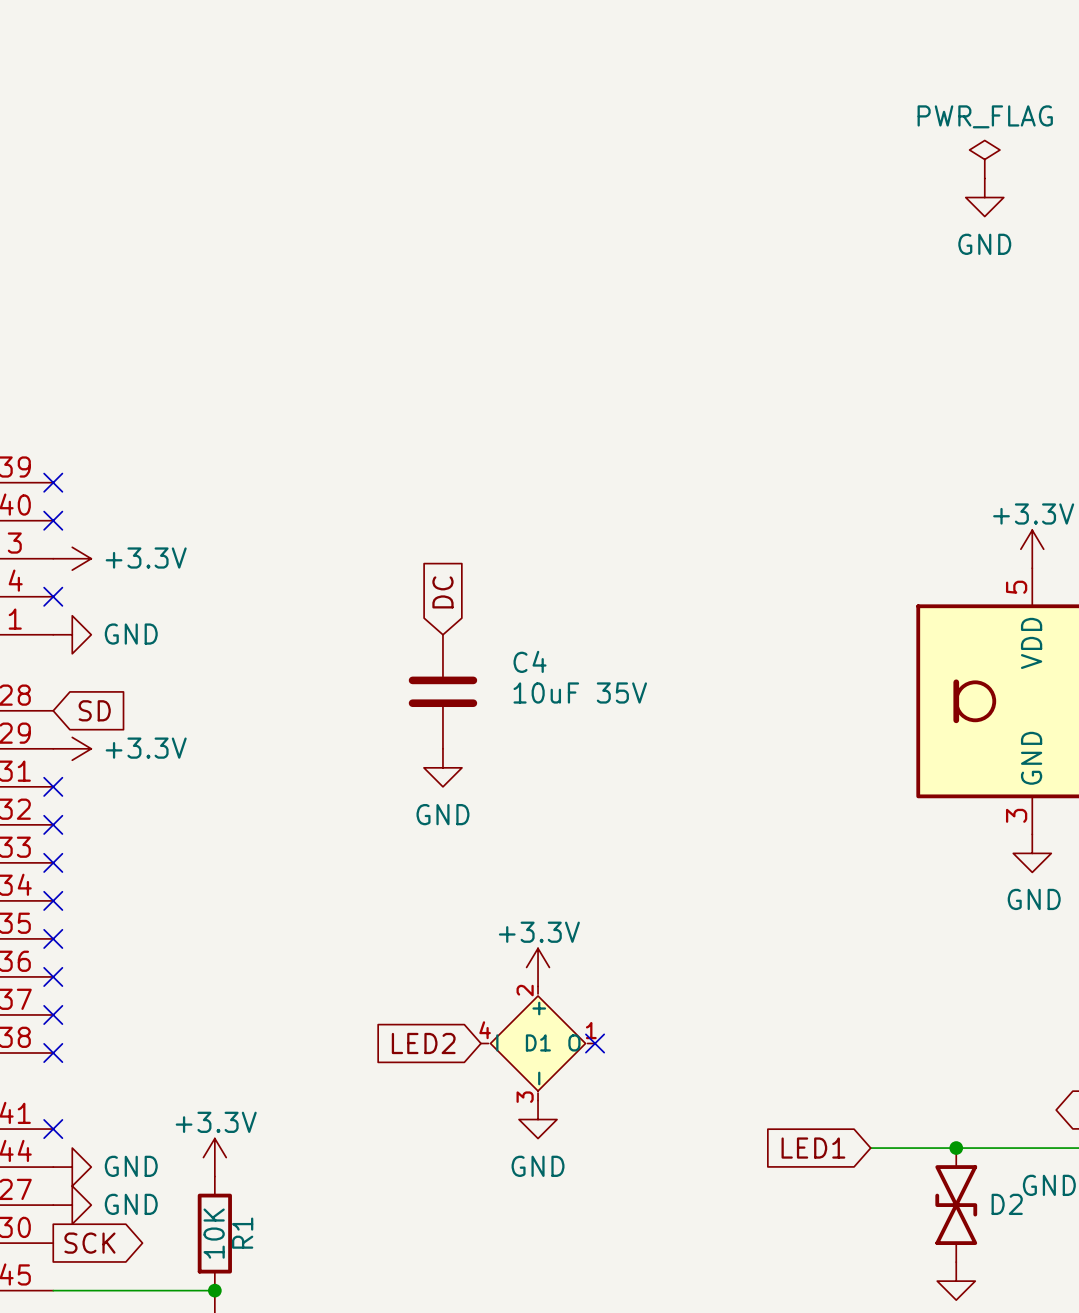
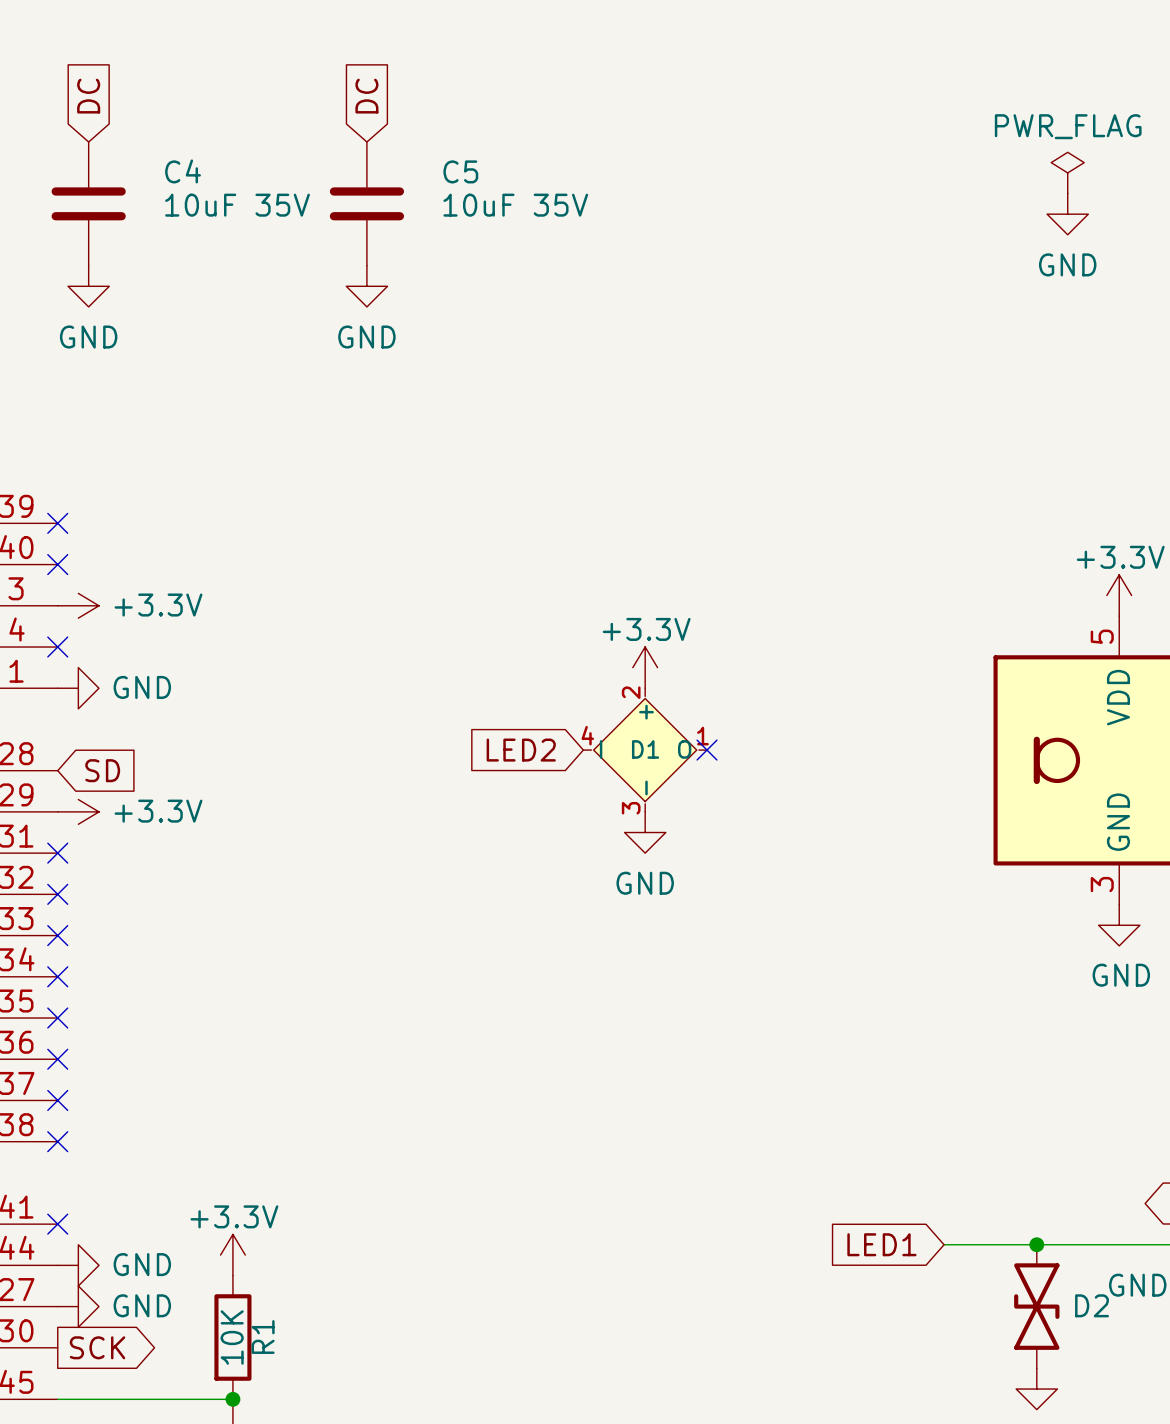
global label: none -> DC (88, 96)
global label: none -> DC (366, 96)
C5: none -> 10uF 35V (366, 203)
power symbol: none -> GND (88, 286)
power symbol: none -> GND (366, 286)
global label: DC (442, 592) -> none
C4 position: (442, 691) -> (88, 203)
no-connect mark: none -> (707, 750)
power symbol position: GND (442, 767) -> GND (645, 832)
power symbol position: +3.3V (538, 967) -> +3.3V (645, 667)
global label position: LED2 (423, 1043) -> LED2 (521, 750)
D1 position: (538, 1043) -> (645, 750)
no-connect mark: (595, 1043) -> none
power symbol: GND (538, 1119) -> none

